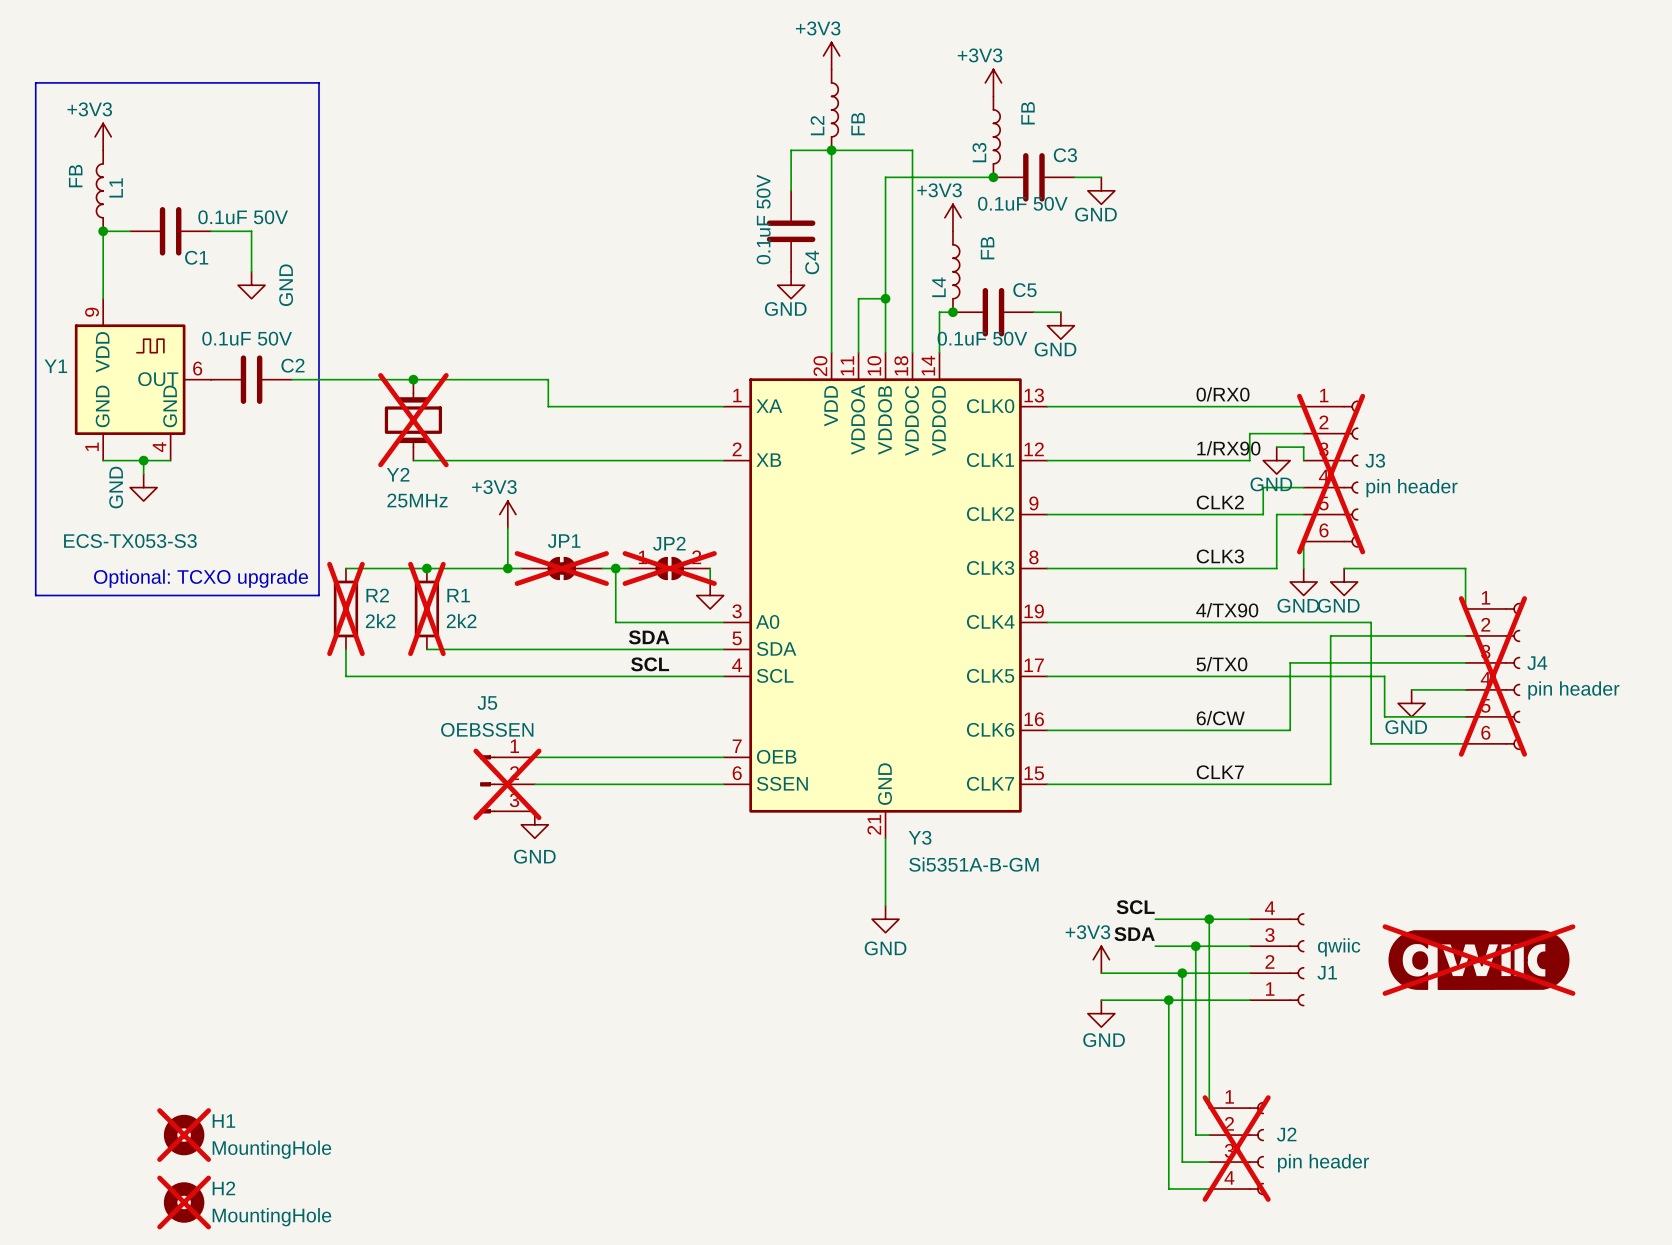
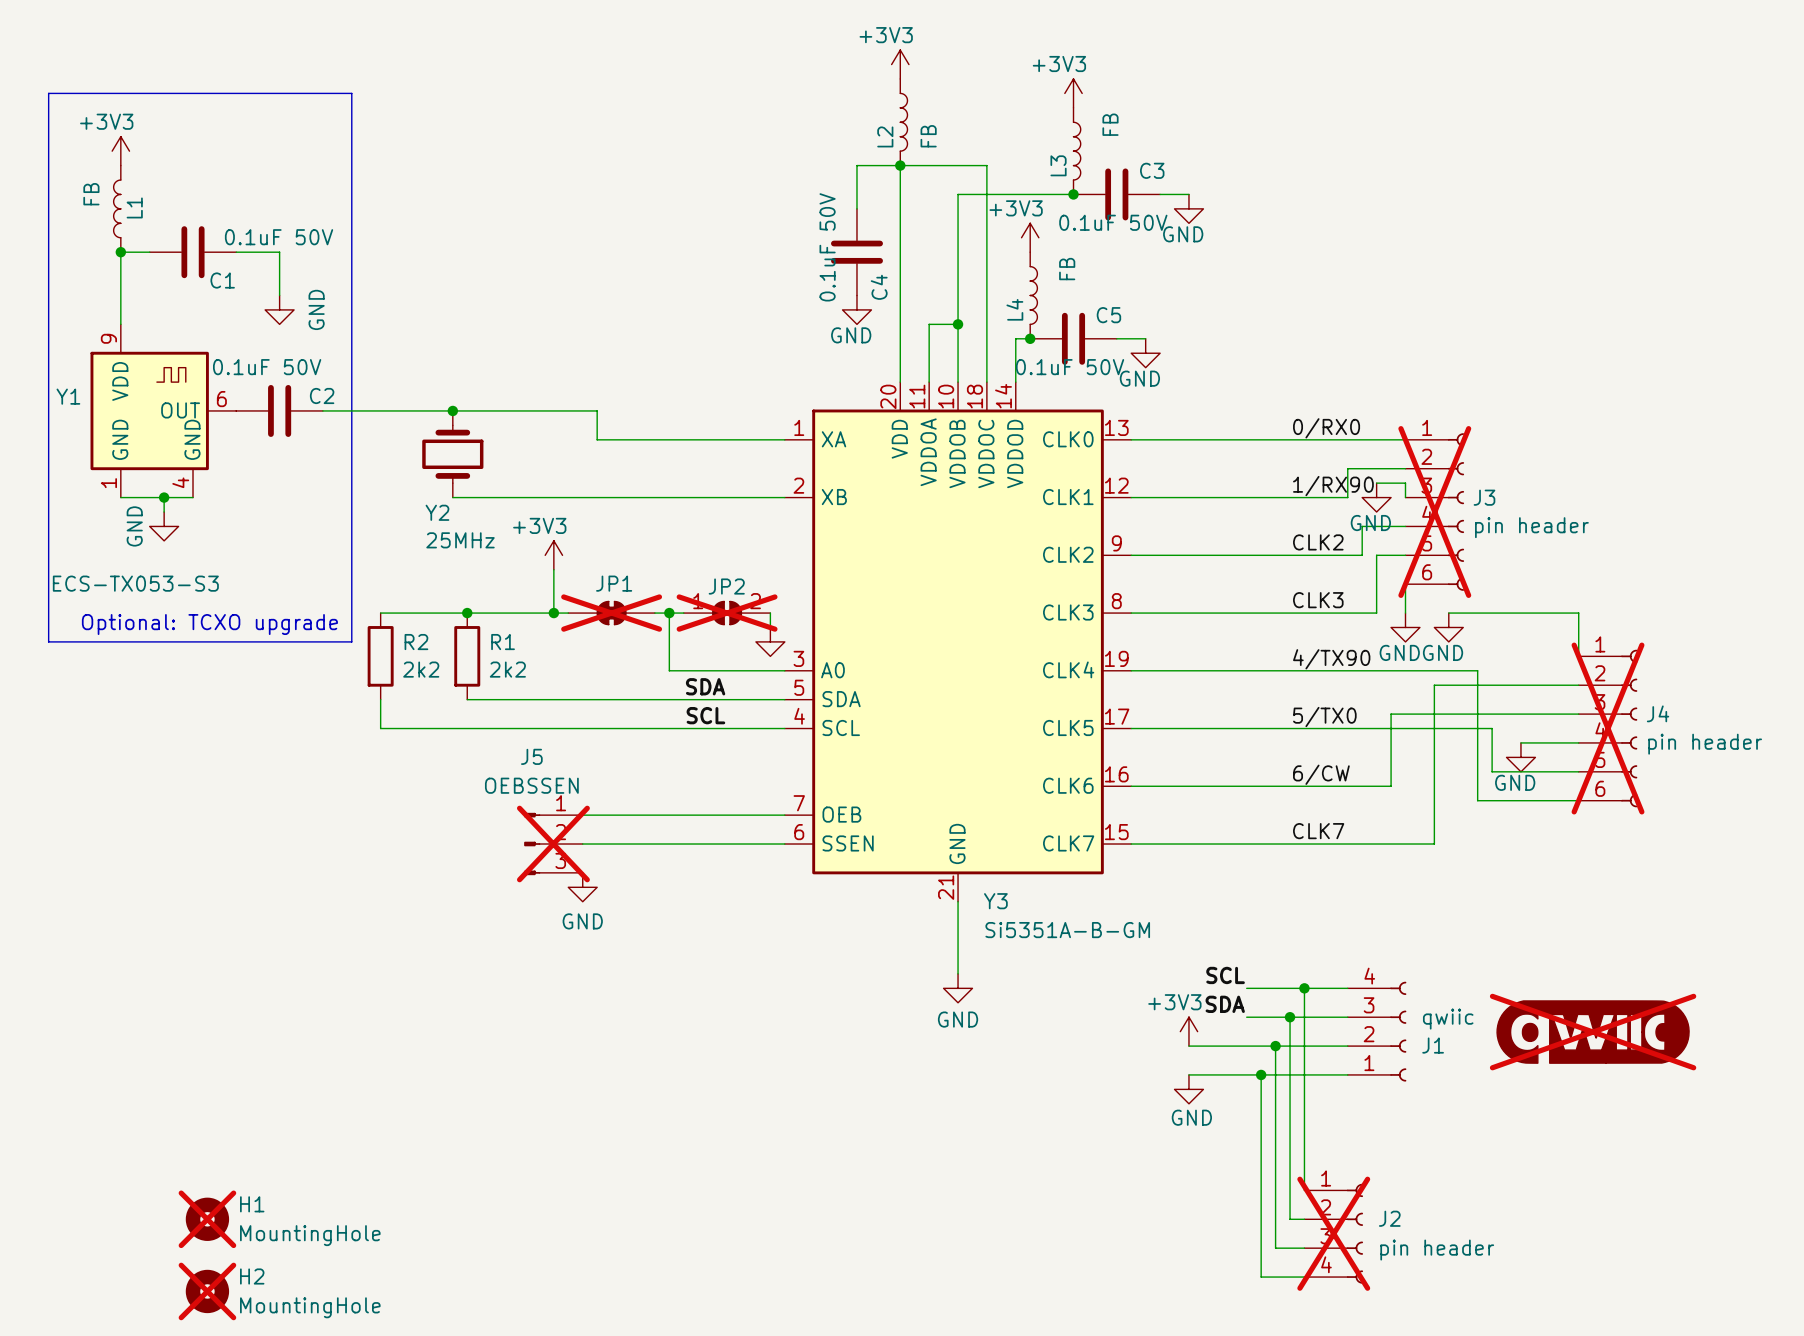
Y2 do-not-place cross: (413, 420) -> none
R2 do-not-place cross: (345, 608) -> none
R1 do-not-place cross: (426, 608) -> none

